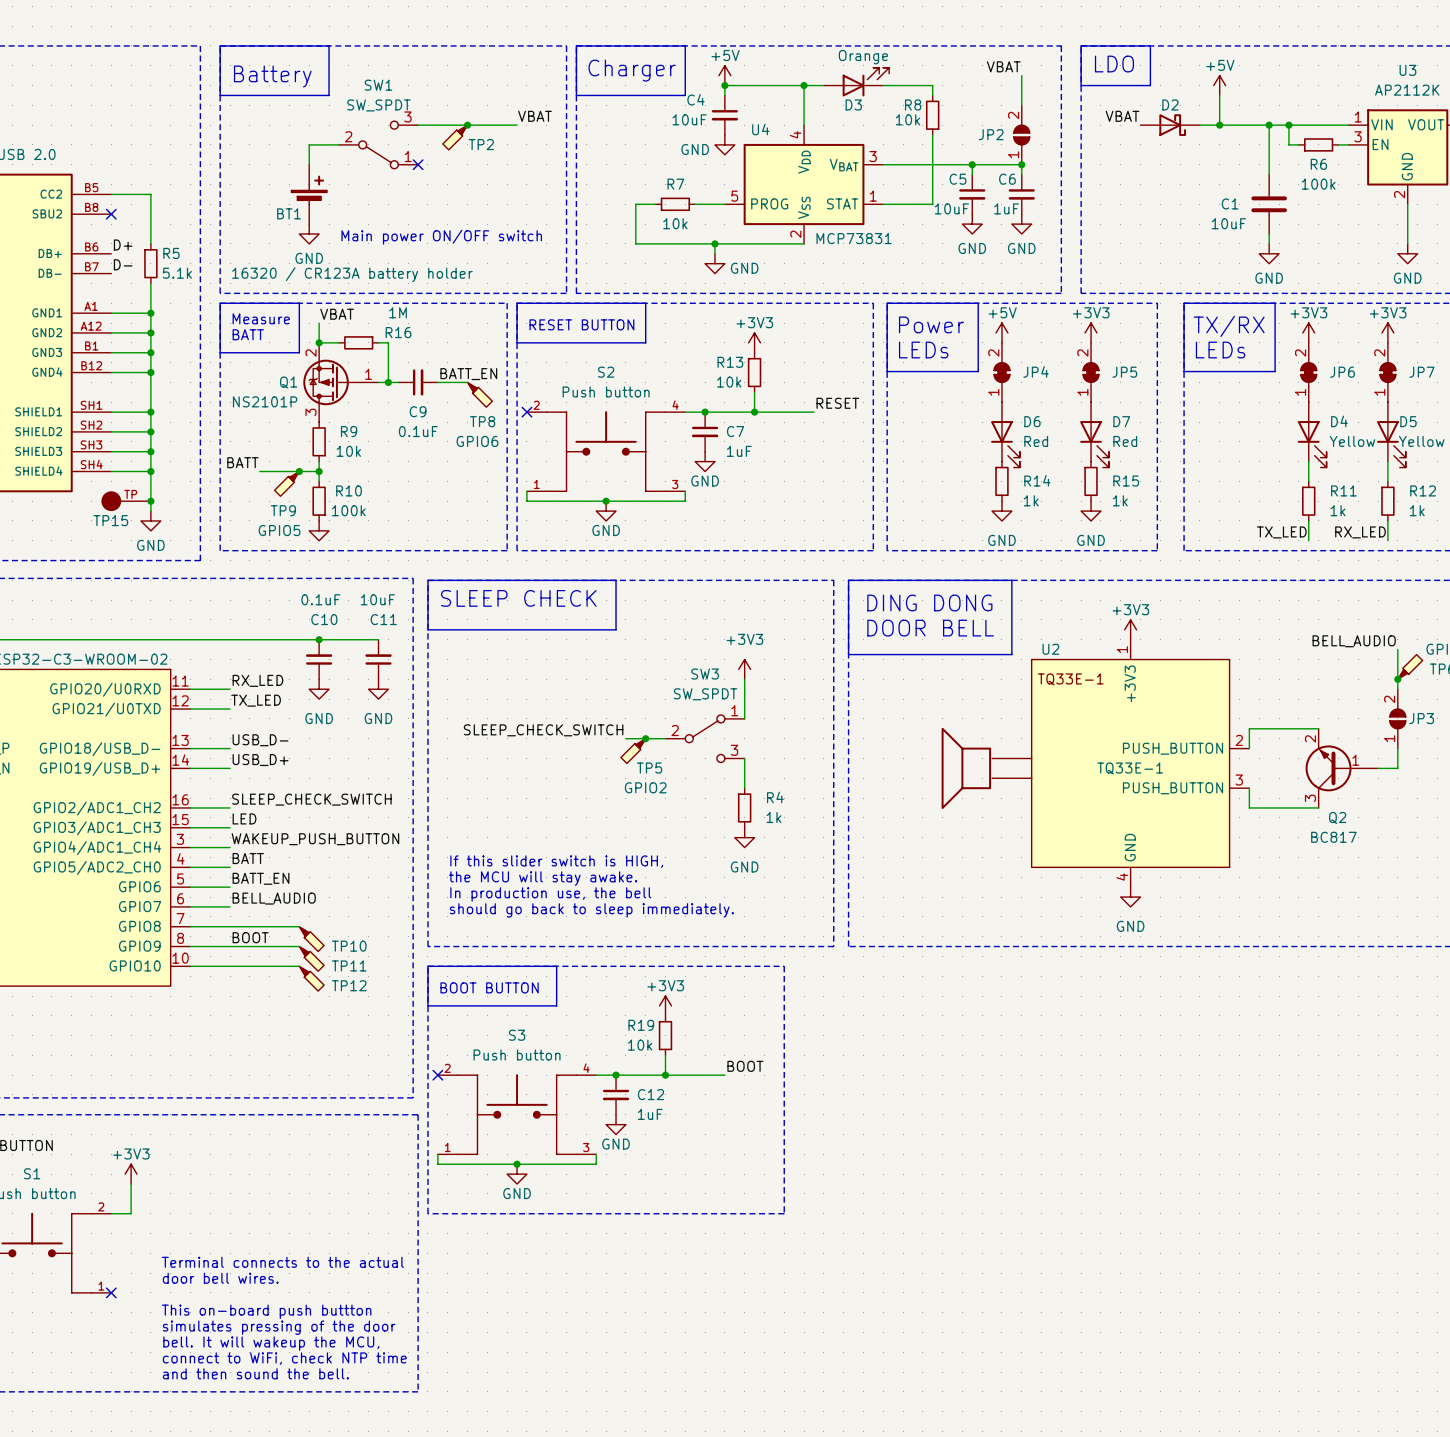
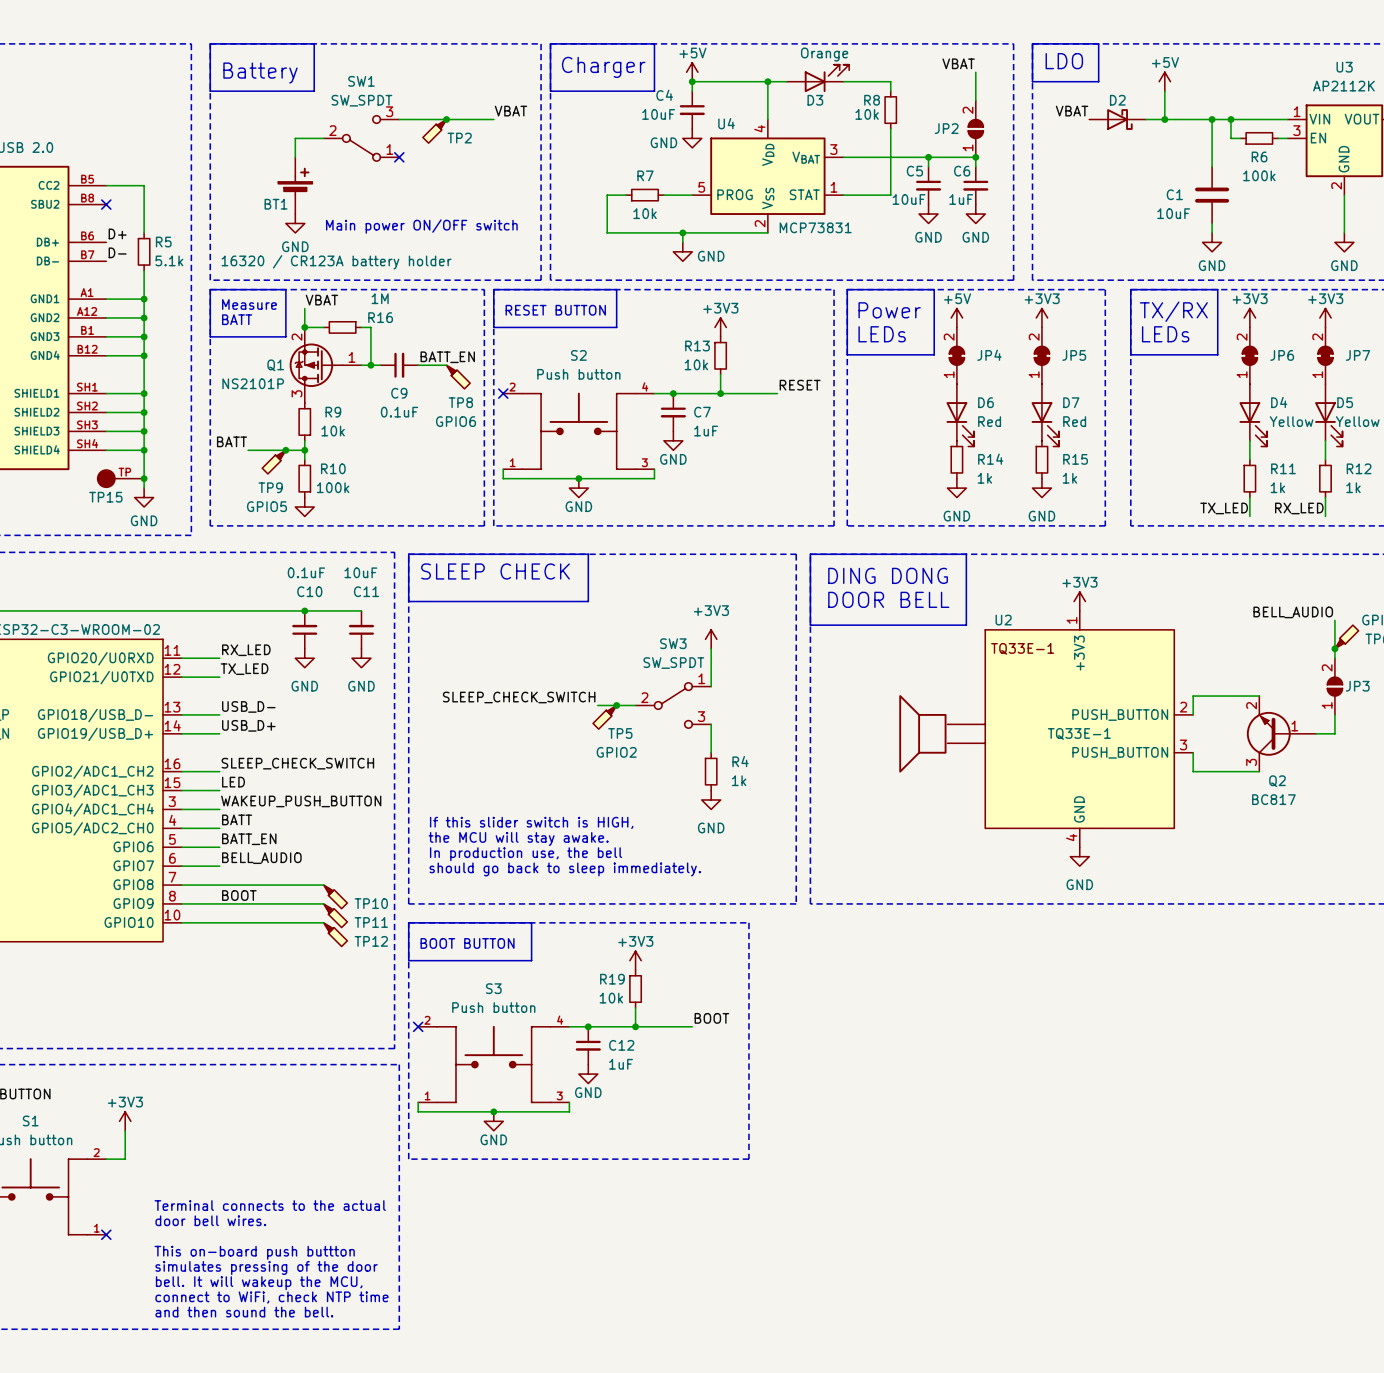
wire: none -> (285, 885) (323, 885)
TP10 position: (311, 939) -> (335, 896)
wire: none -> (285, 903) (323, 903)
TP11 position: (311, 958) -> (335, 915)
wire: none -> (285, 922) (323, 922)
TP12 position: (311, 978) -> (335, 934)

